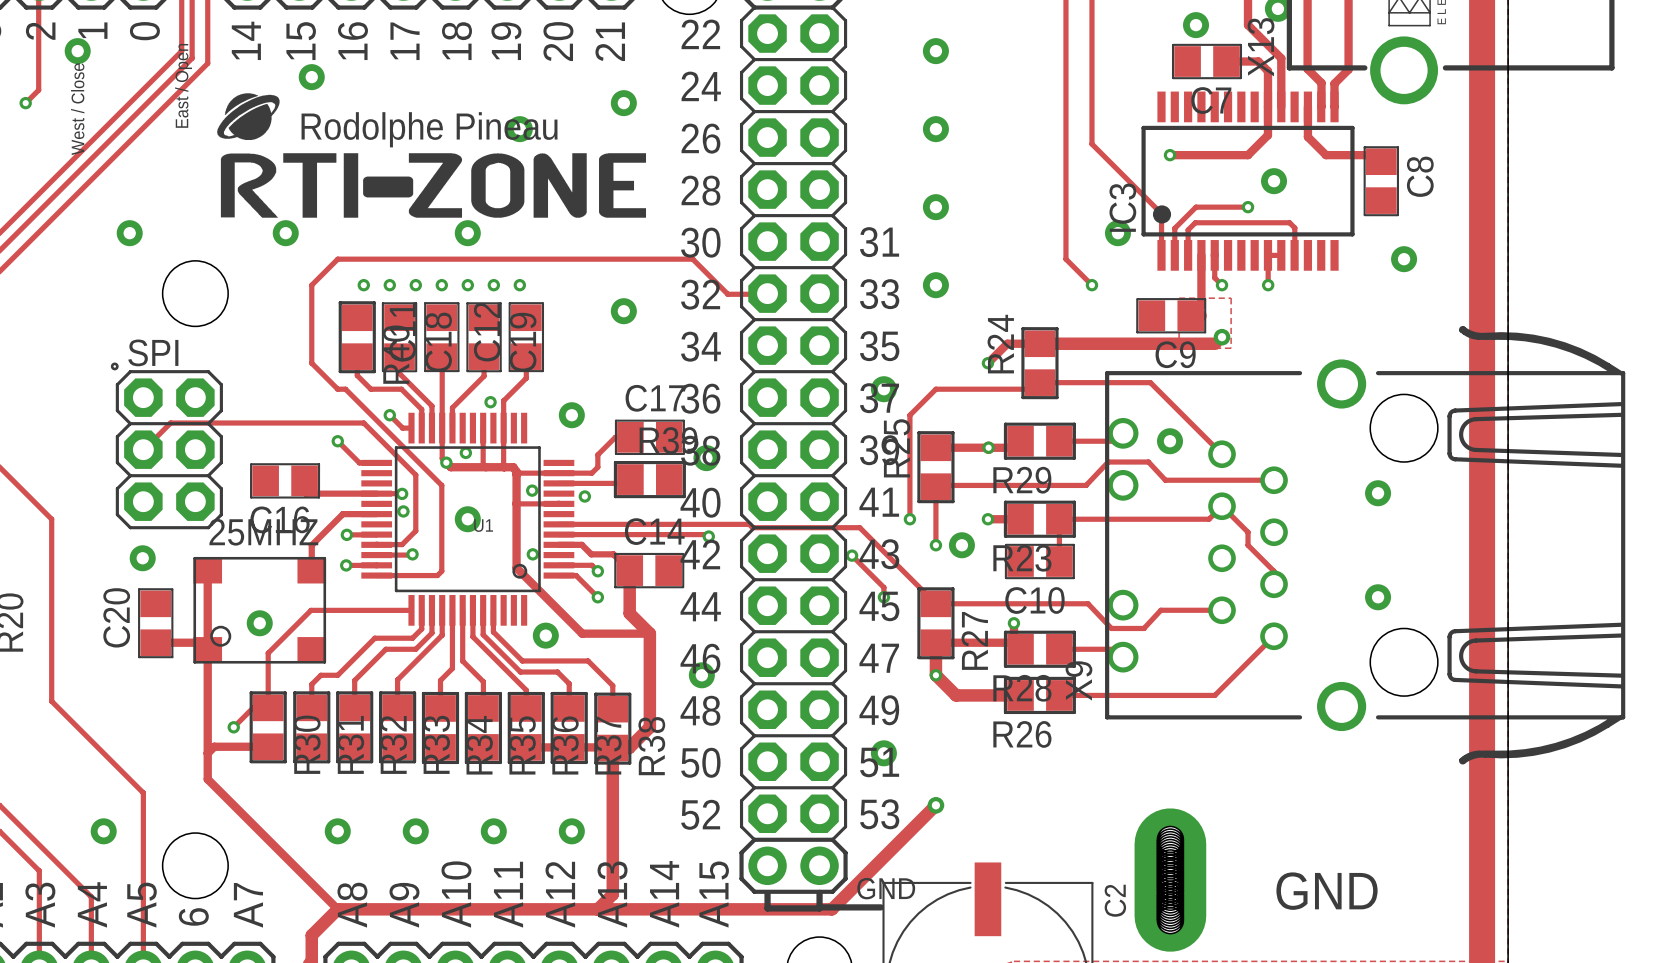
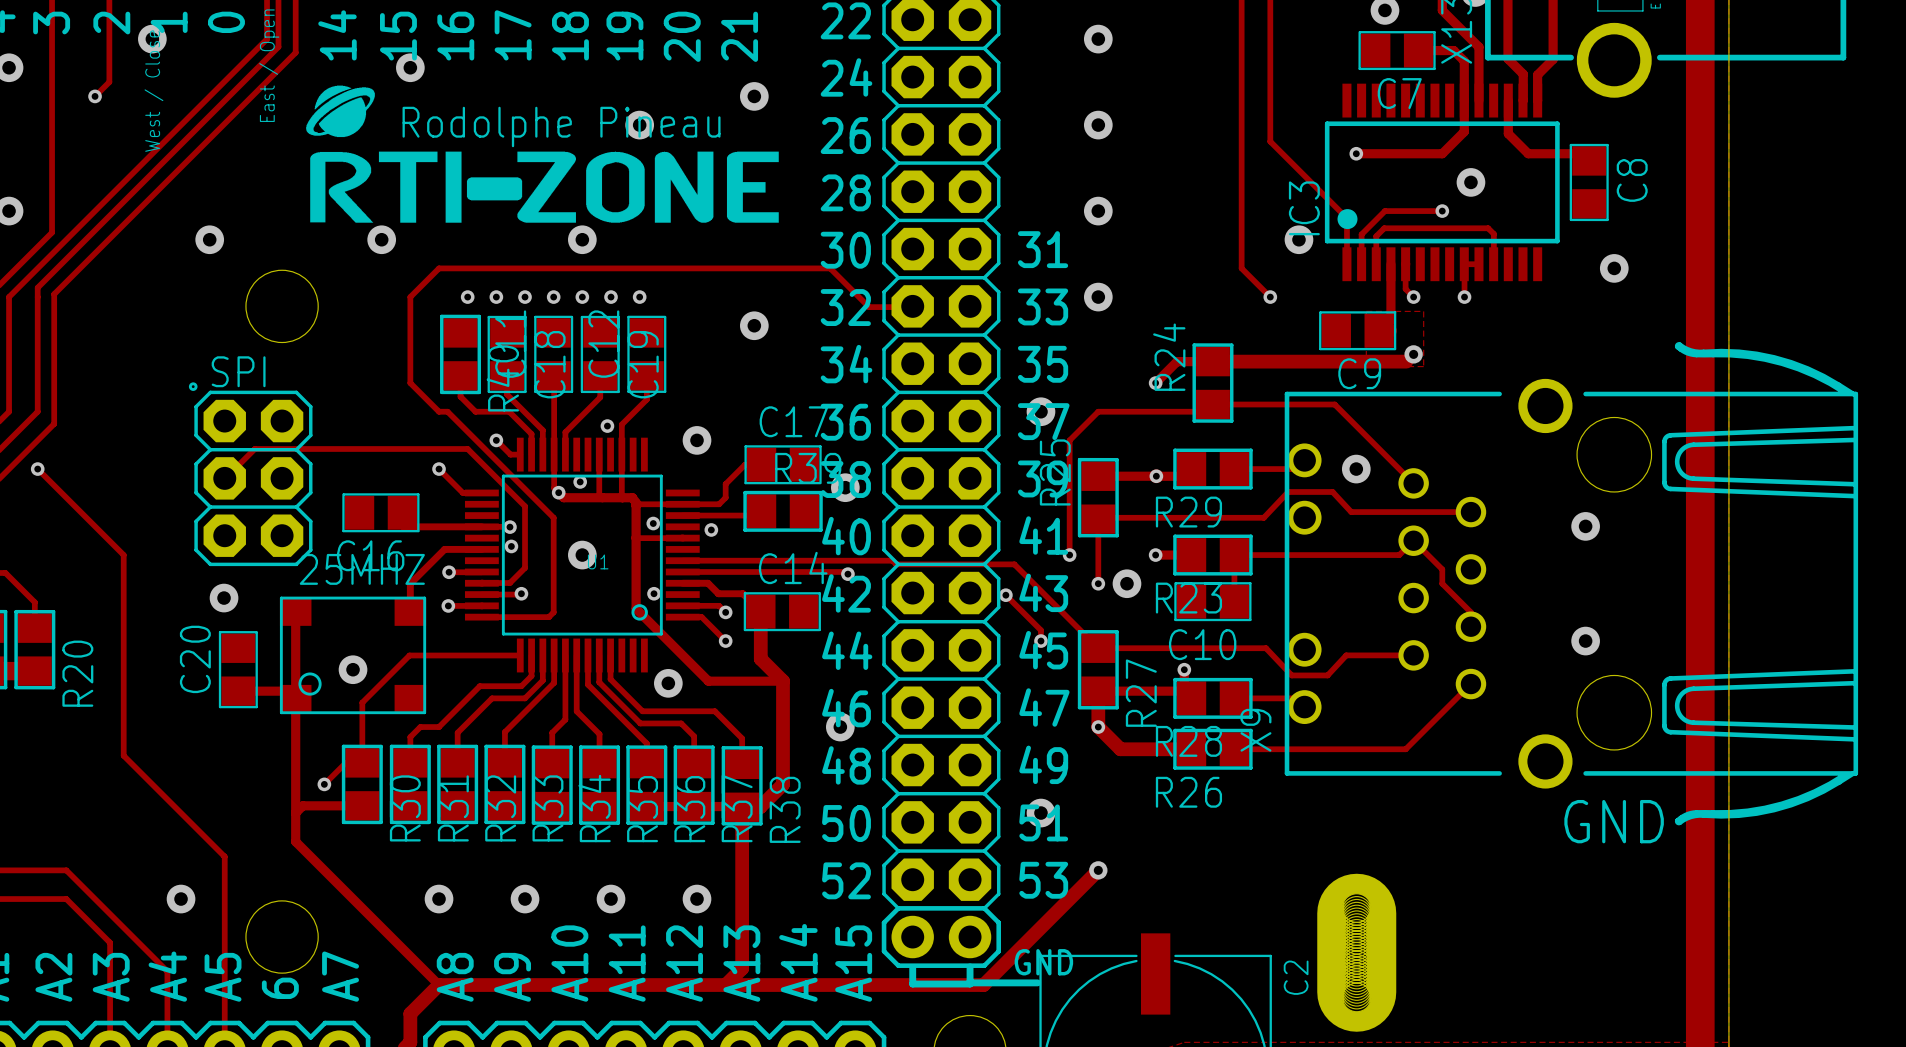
text position: GND (1327, 891) -> GND (1614, 821)

